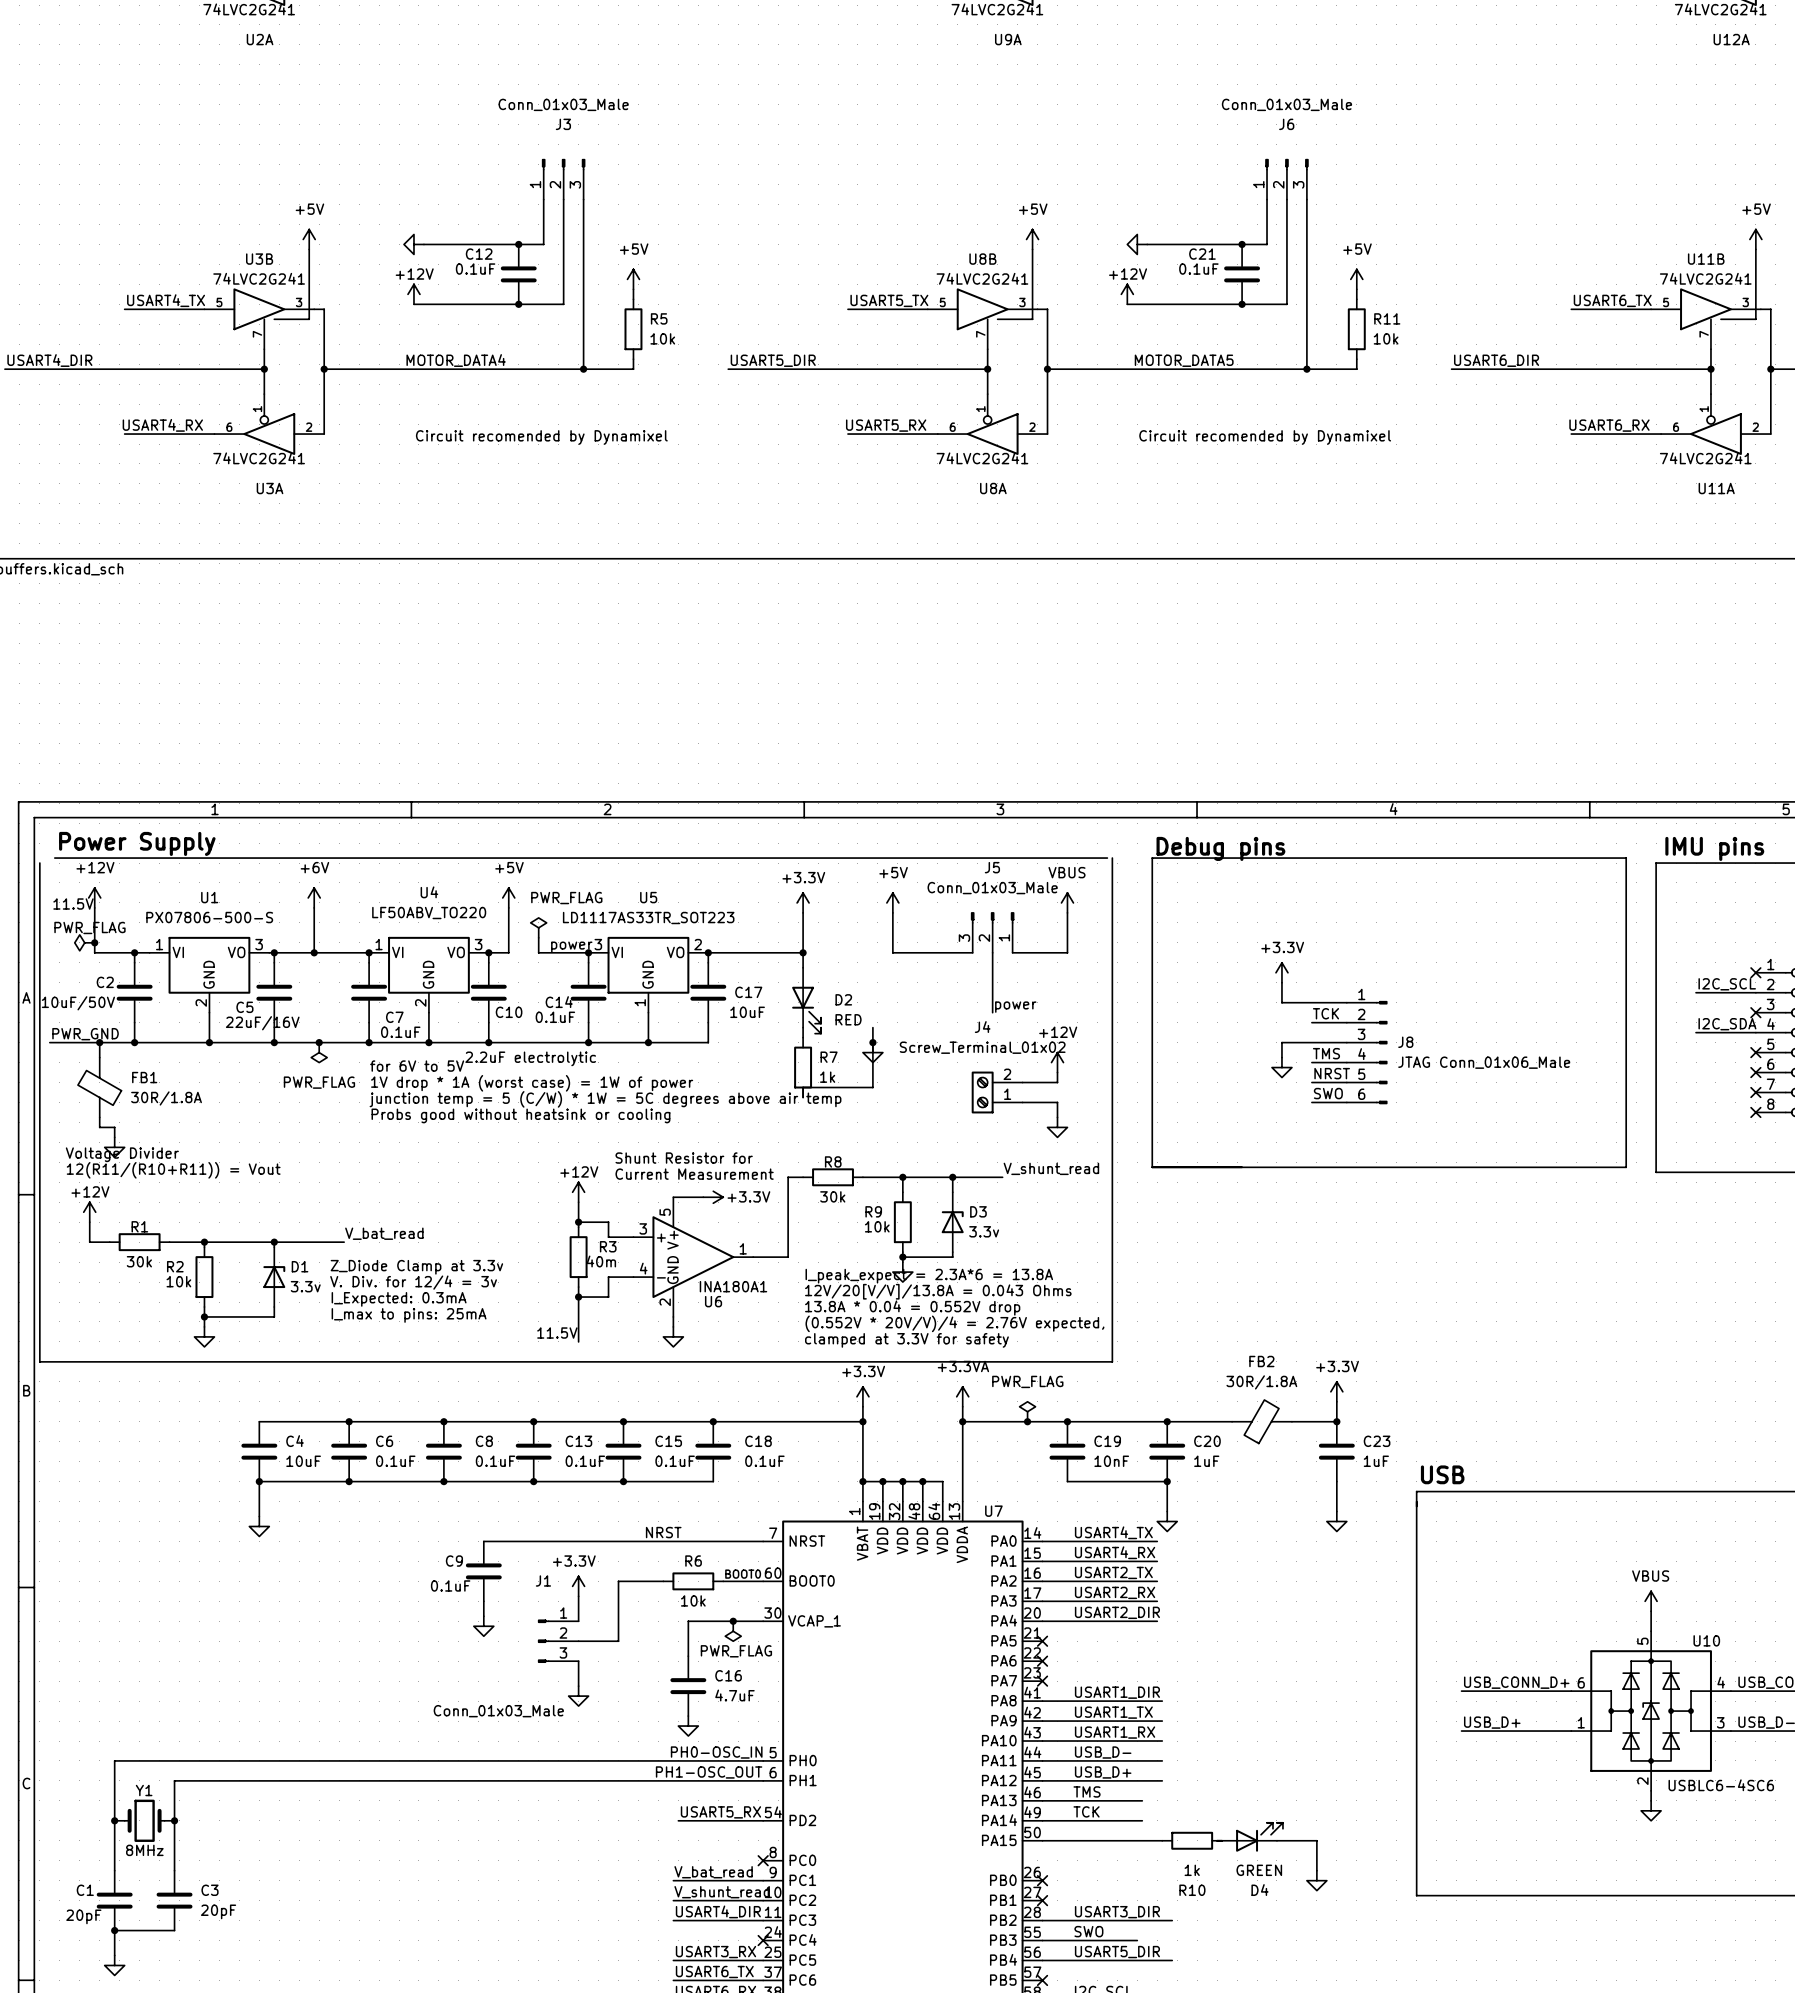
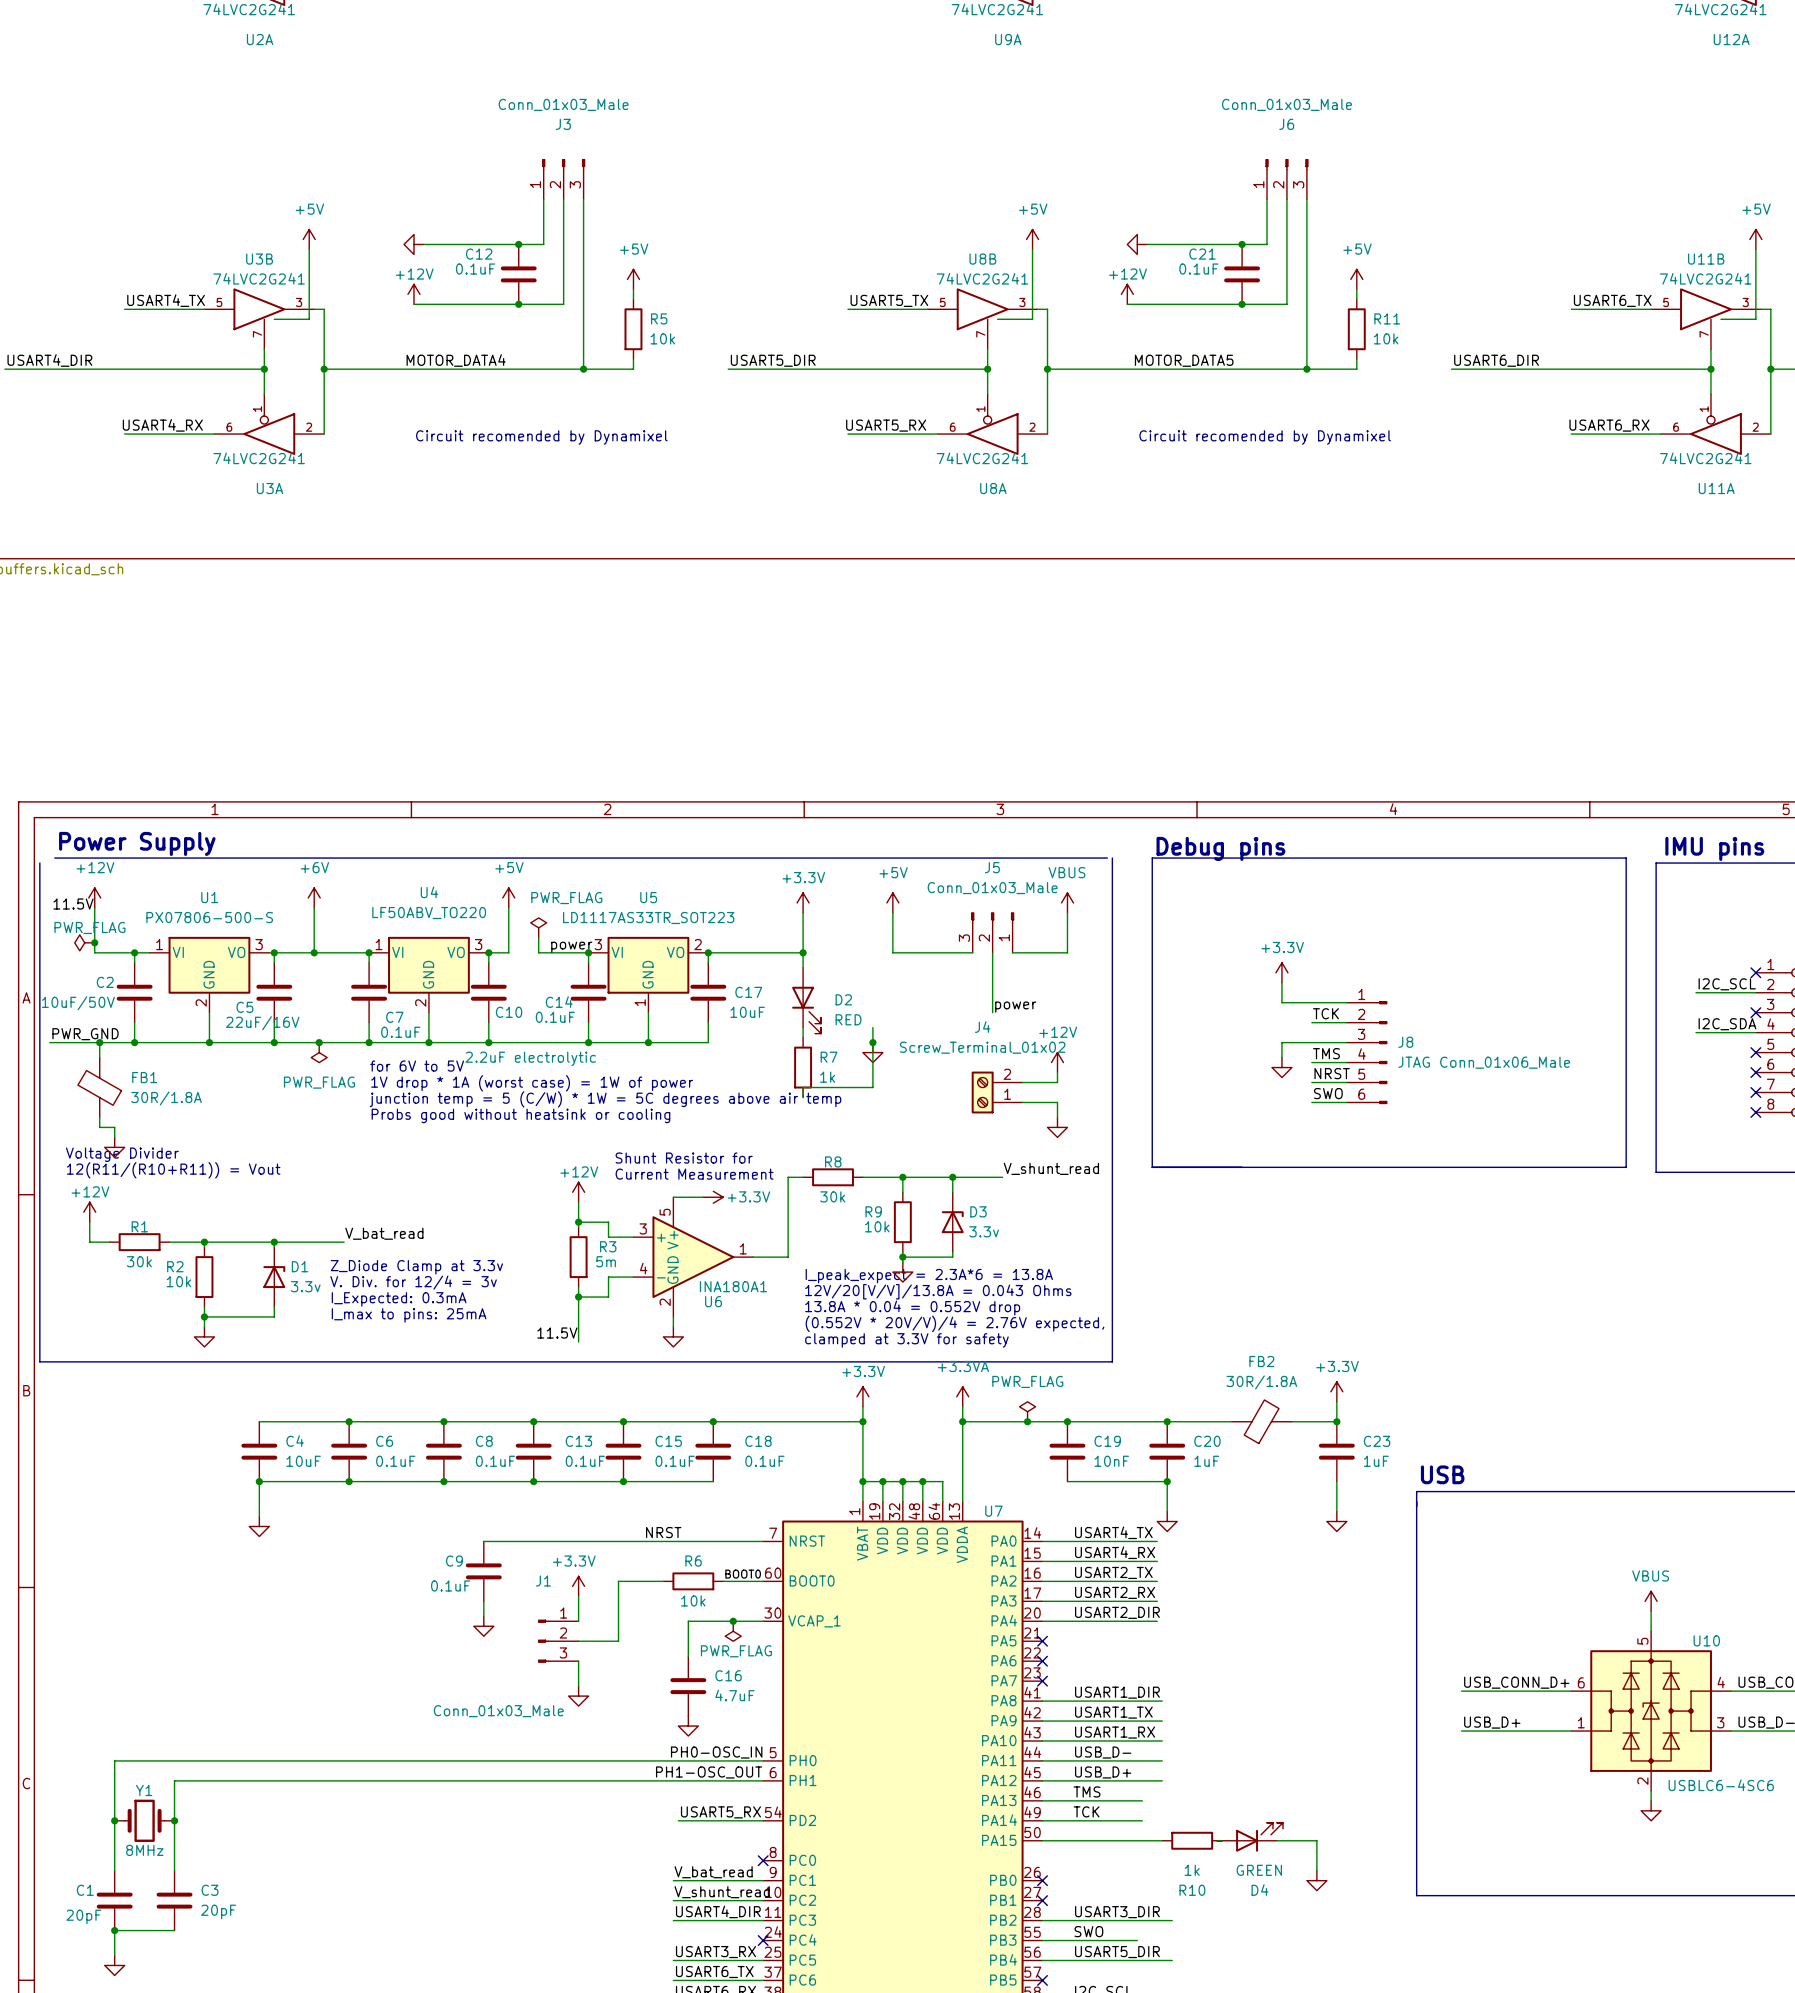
R3 value: 40m (601, 1261) -> 5m (606, 1261)

